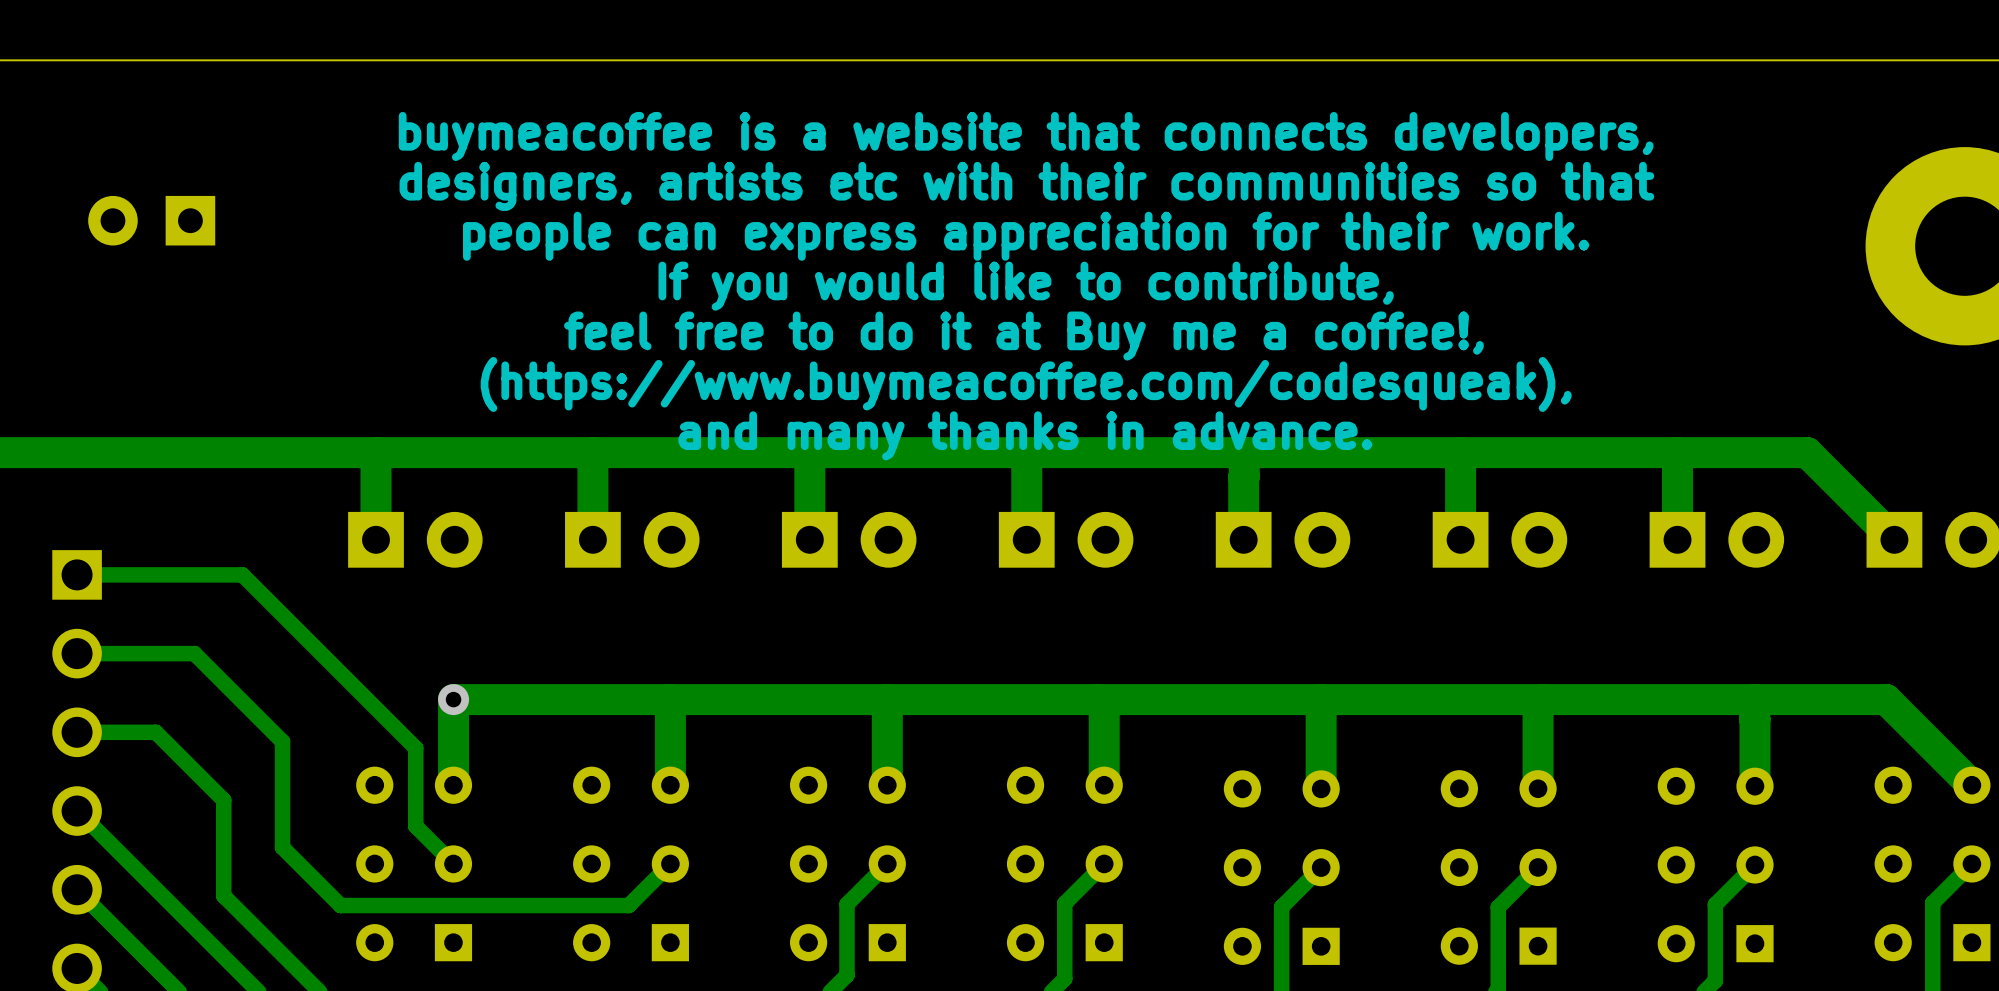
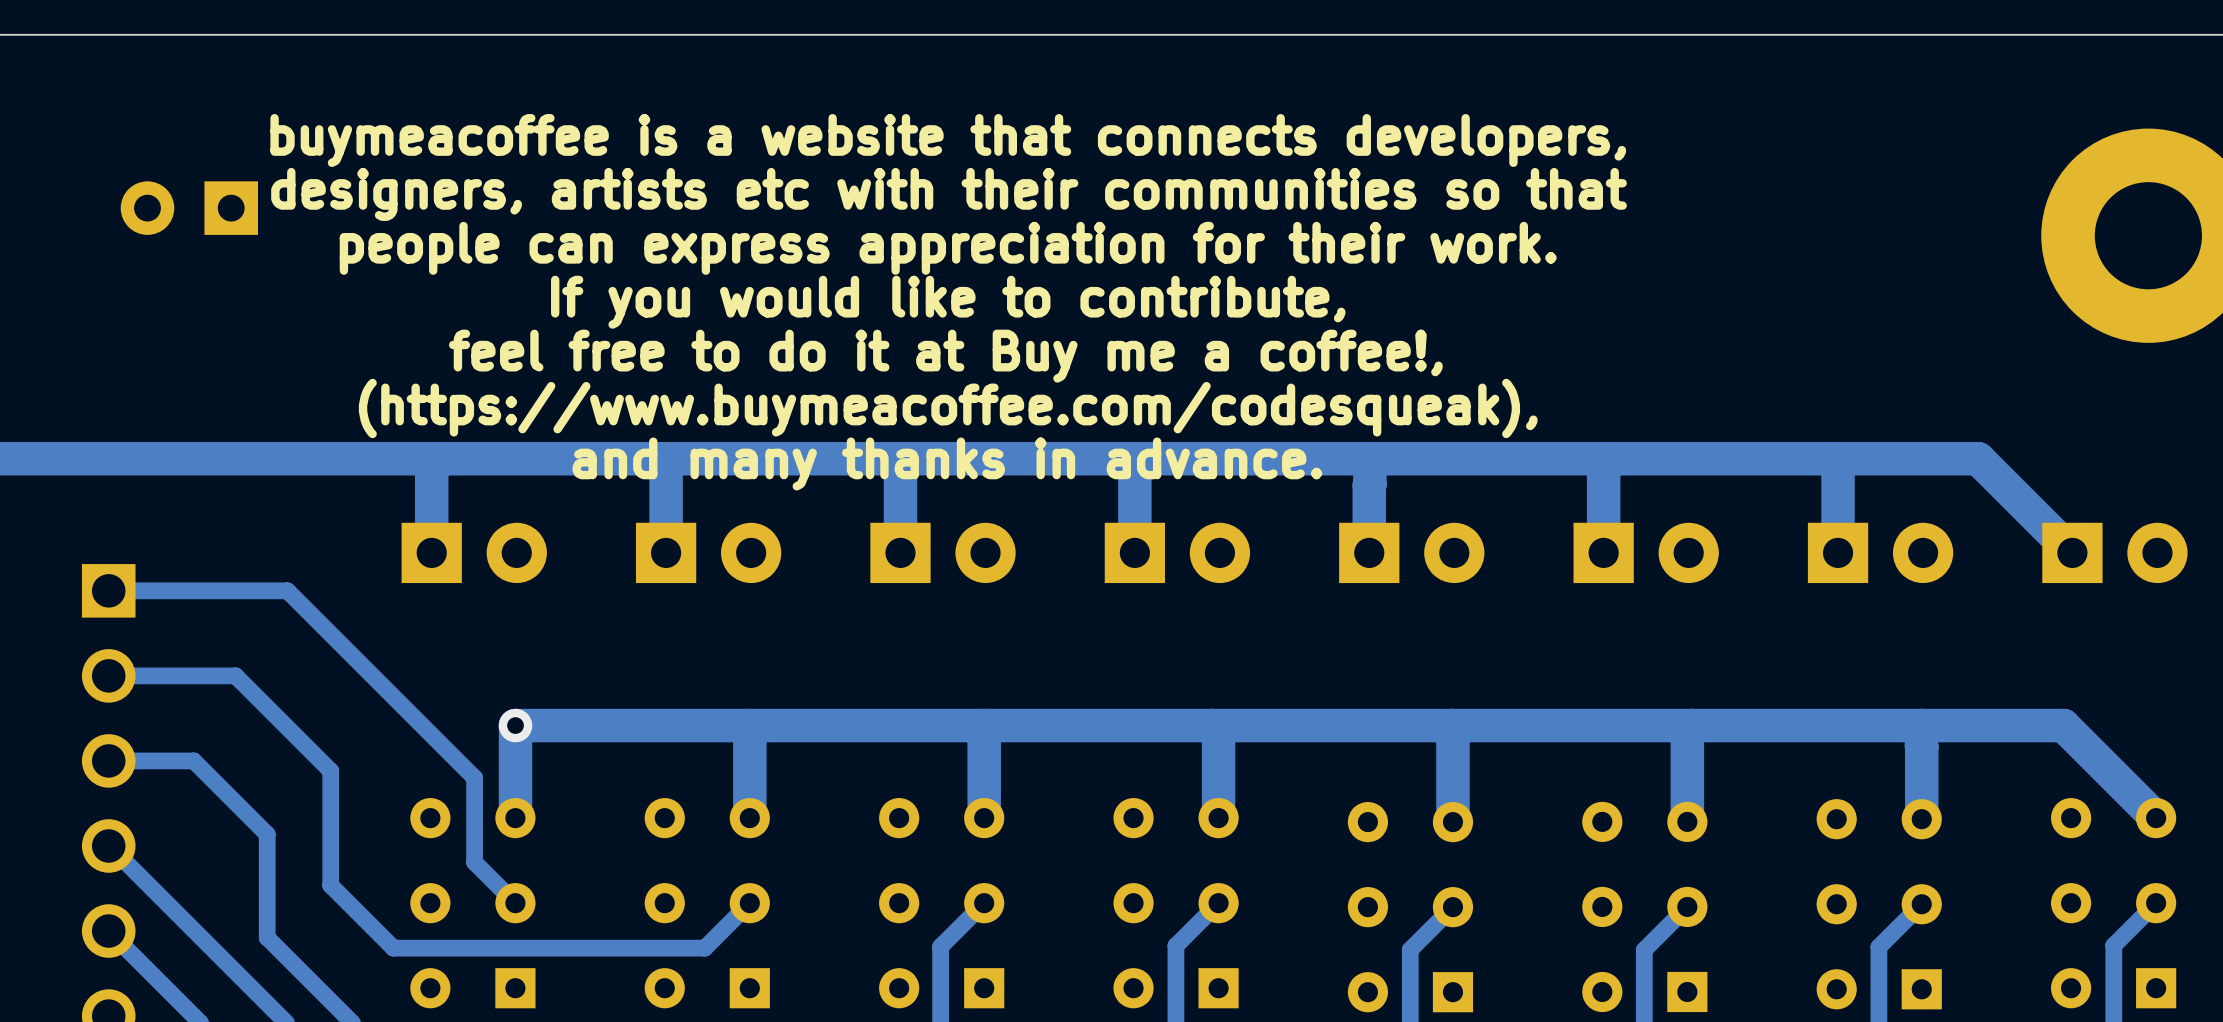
text position: buymeacoffee is a website that connects developers, (1026, 136) -> buymeacoffee is a website that connects developers, (948, 140)
text position: designers, artists etc with their communities so that (1026, 186) -> designers, artists etc with their communities so that (949, 194)
text position: people can express appreciation for their work. (1026, 236) -> people can express appreciation for their work. (948, 248)
text position: If you would like to contribute, (1026, 286) -> If you would like to contribute, (948, 302)
text position: feel free to do it at Buy me a coffee!, (1023, 336) -> feel free to do it at Buy me a coffee!, (945, 356)
text position: (https://www.buymeacoffee.com/codesqueak), (1026, 384) -> (https://www.buymeacoffee.com/codesqueak), (948, 408)
text position: and many thanks in advance. (1025, 435) -> and many thanks in advance. (947, 463)

